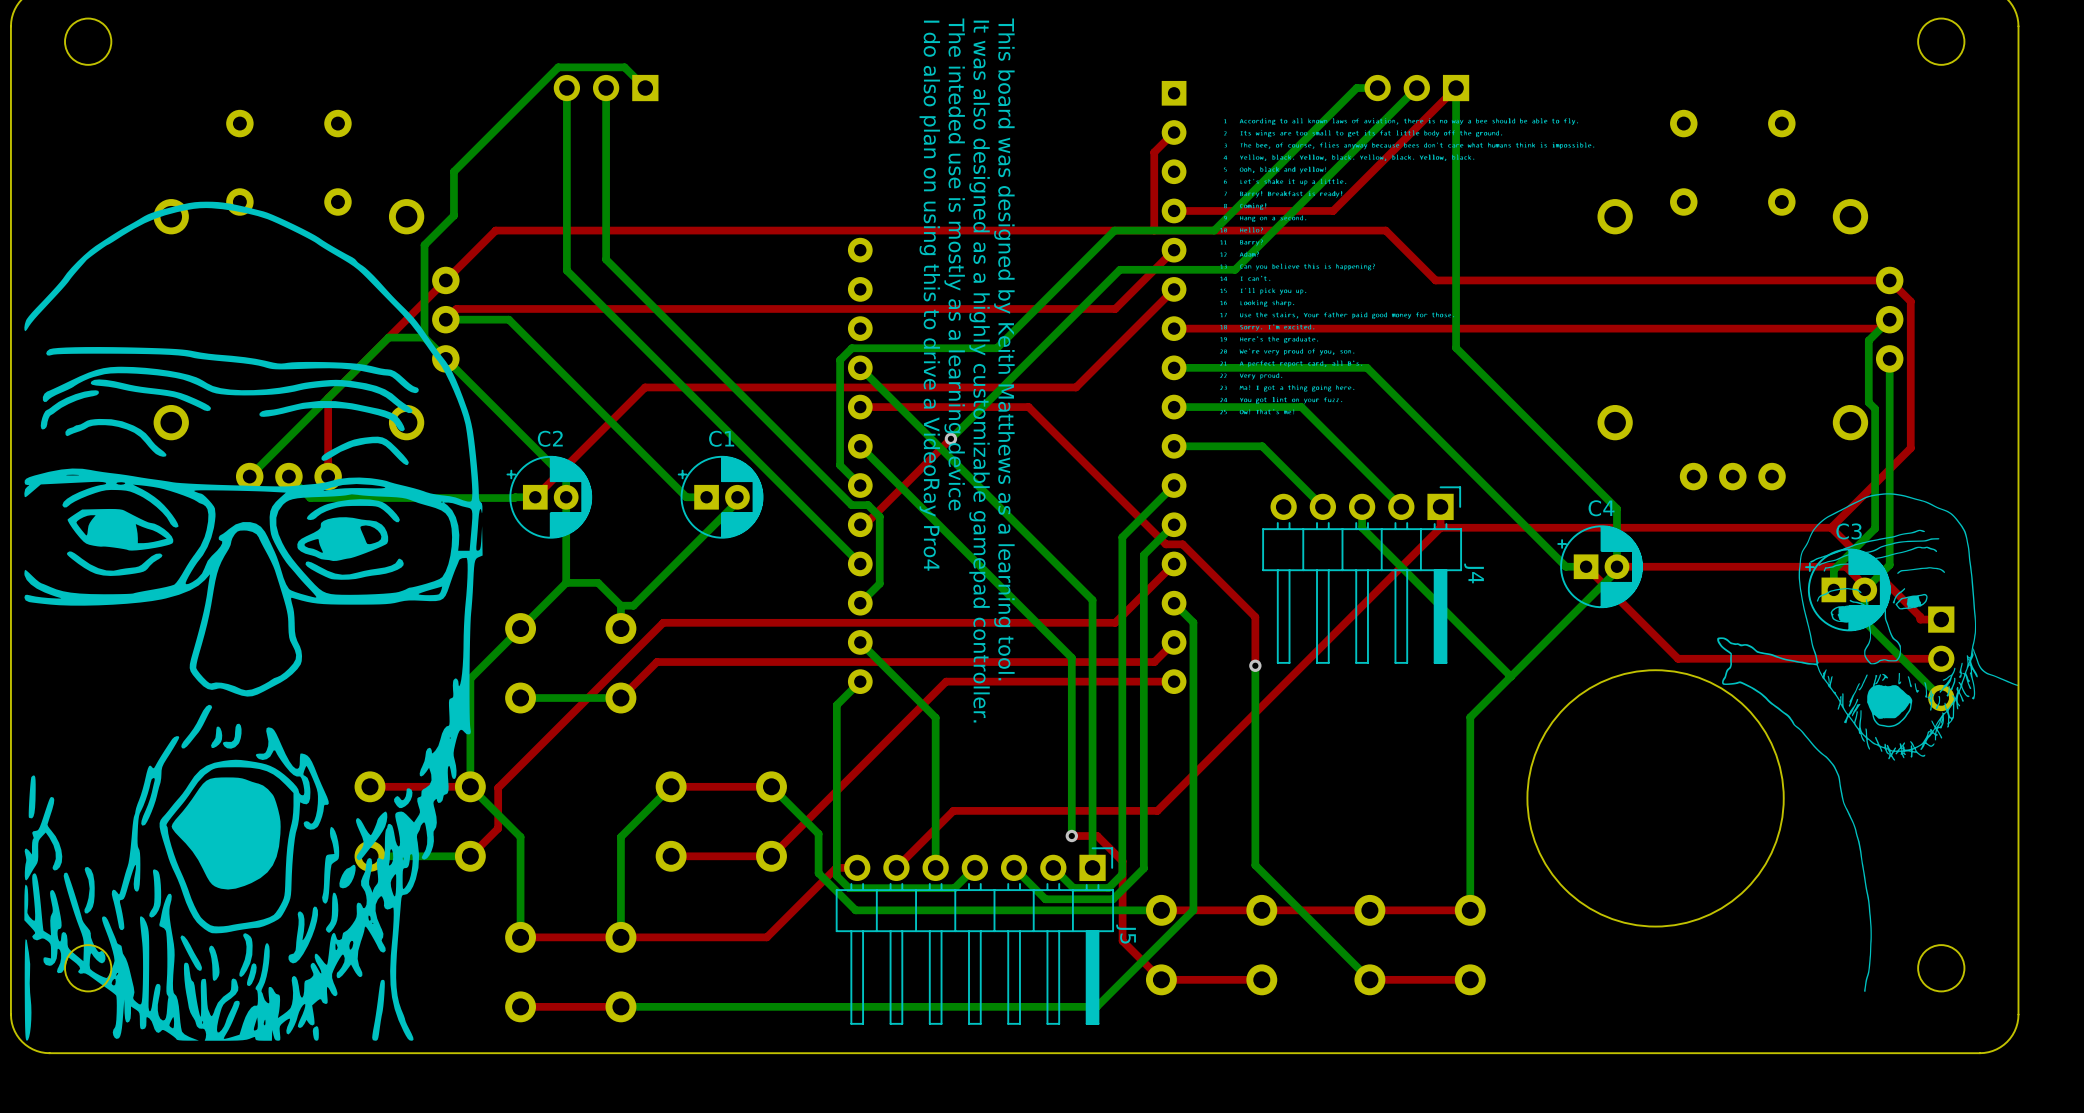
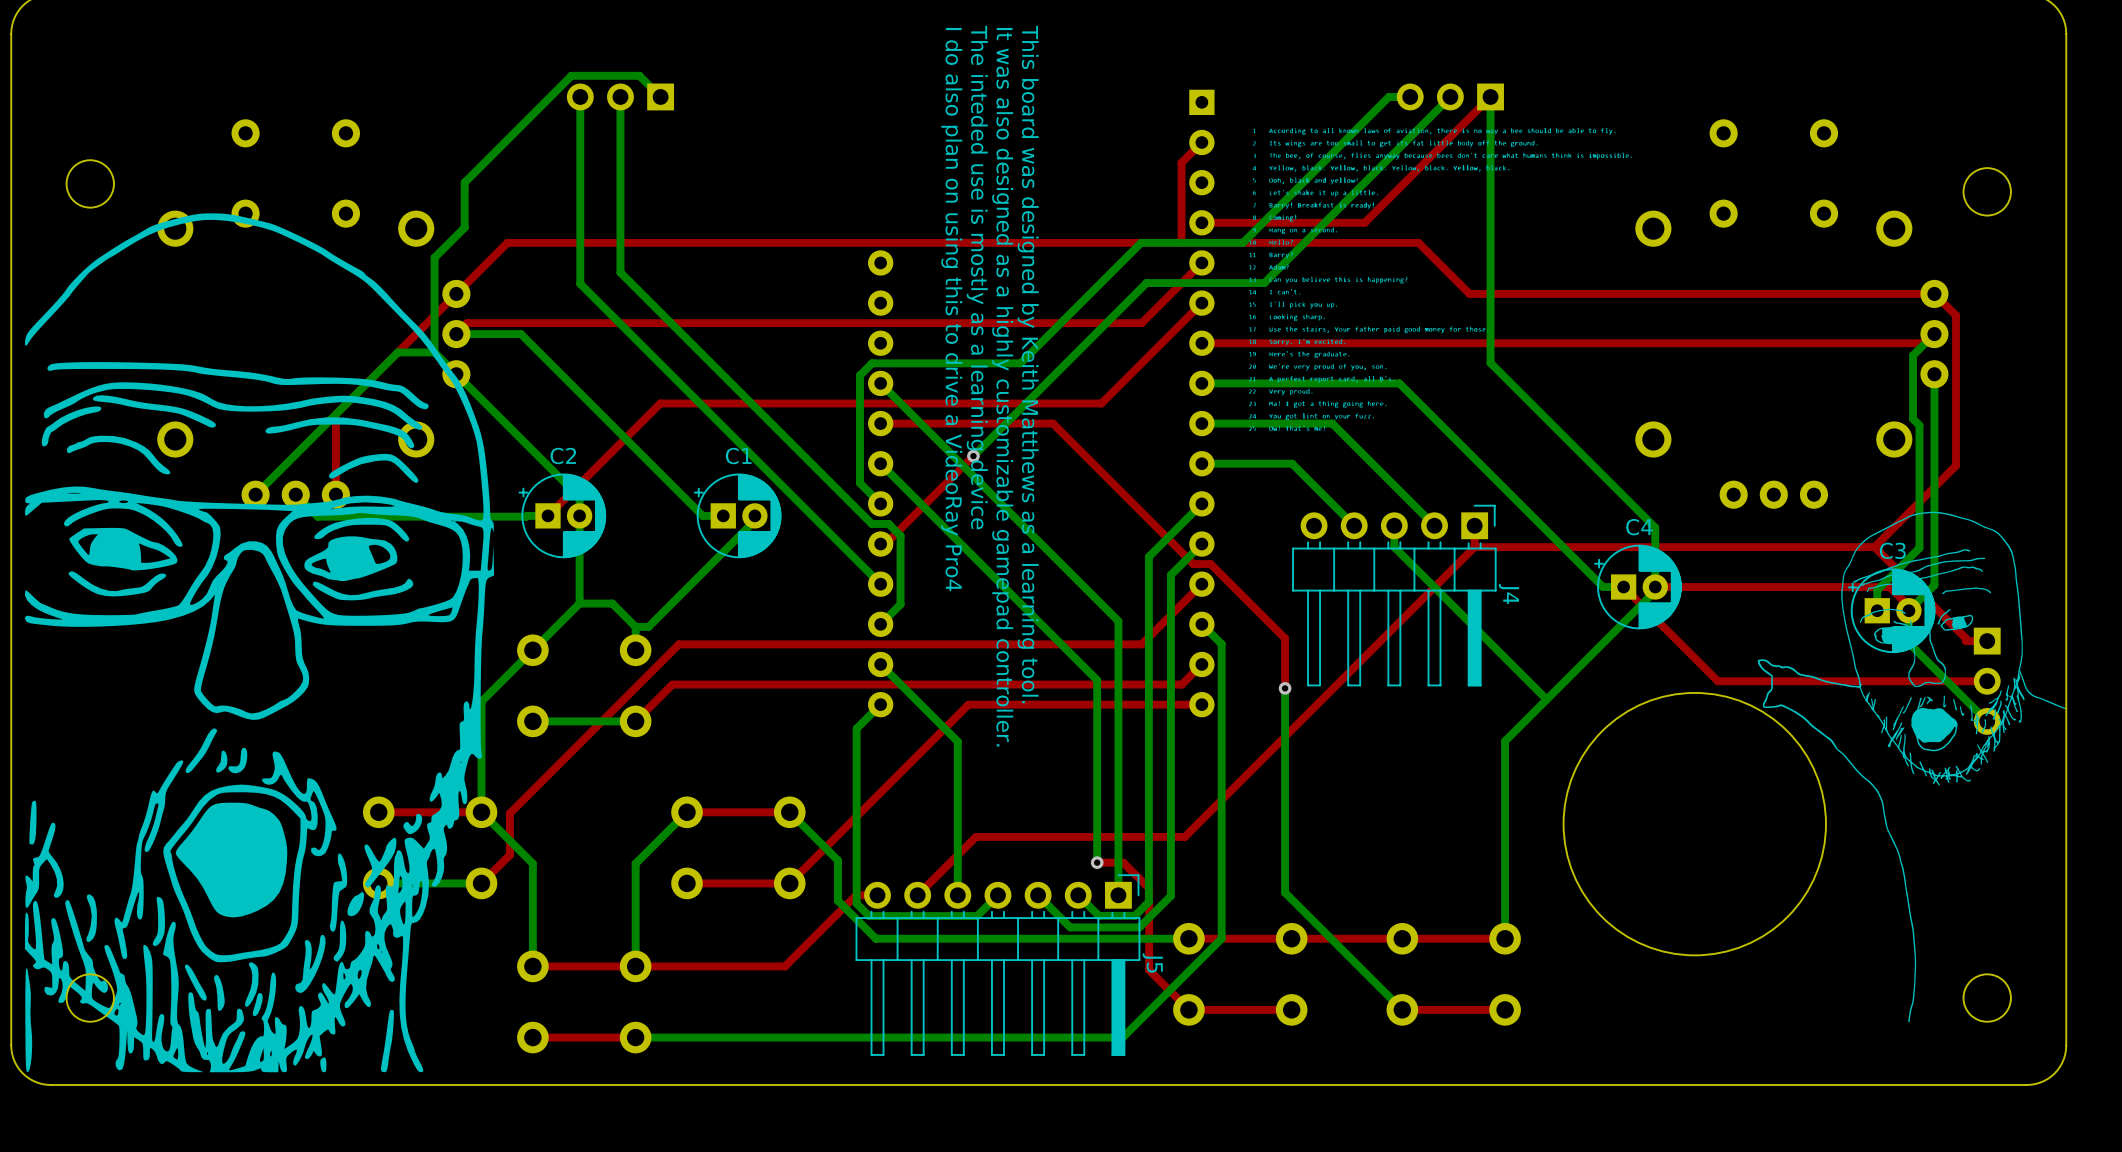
round board edge position: (88, 41) -> (90, 183)
round board edge position: (1941, 41) -> (1987, 191)

